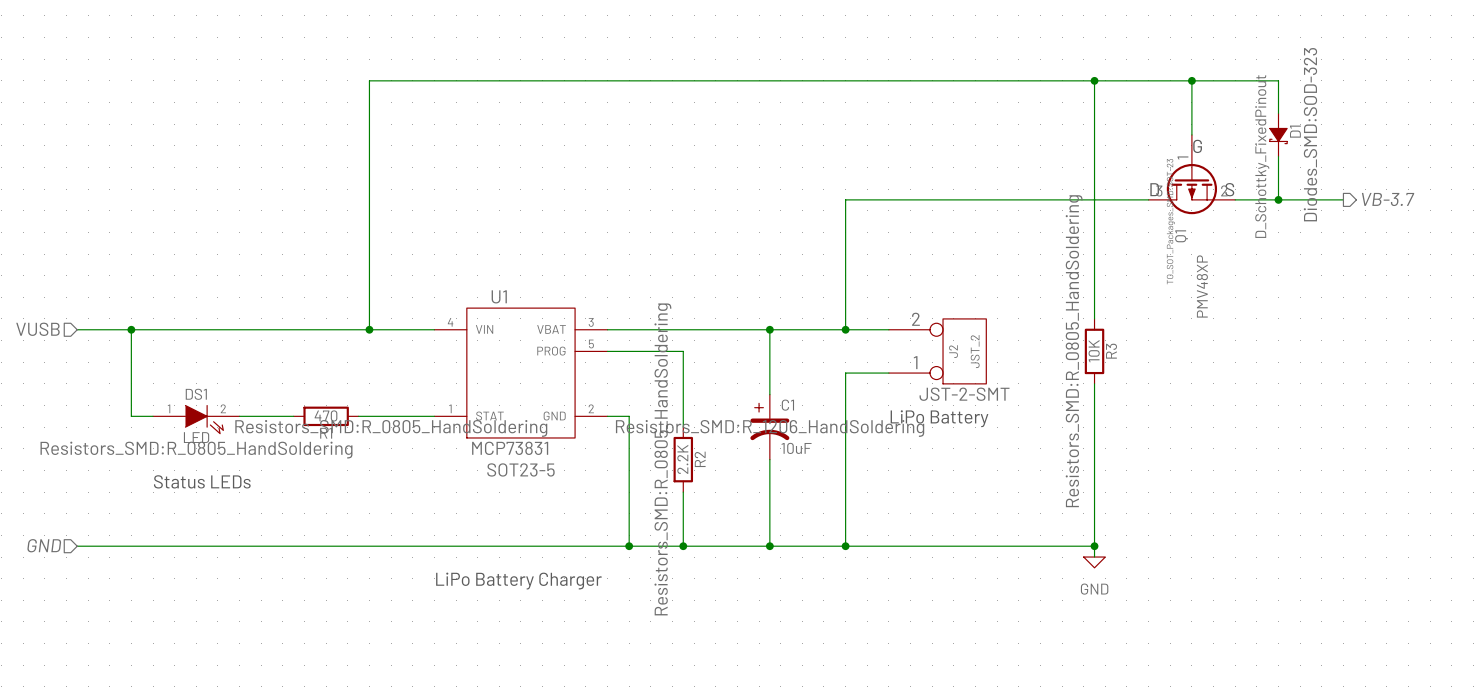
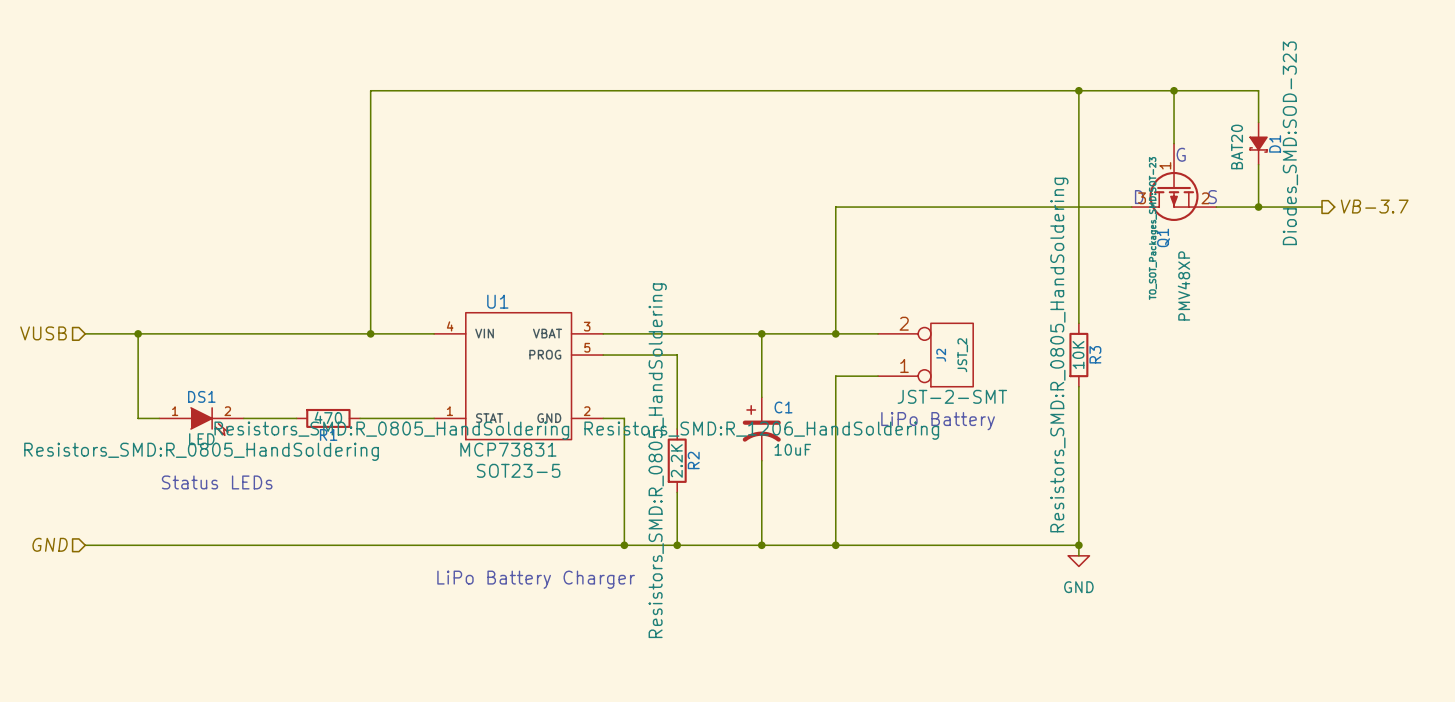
D1 value: D_Schottky_FixedPinout (1262, 156) -> BAT20 (1237, 146)

